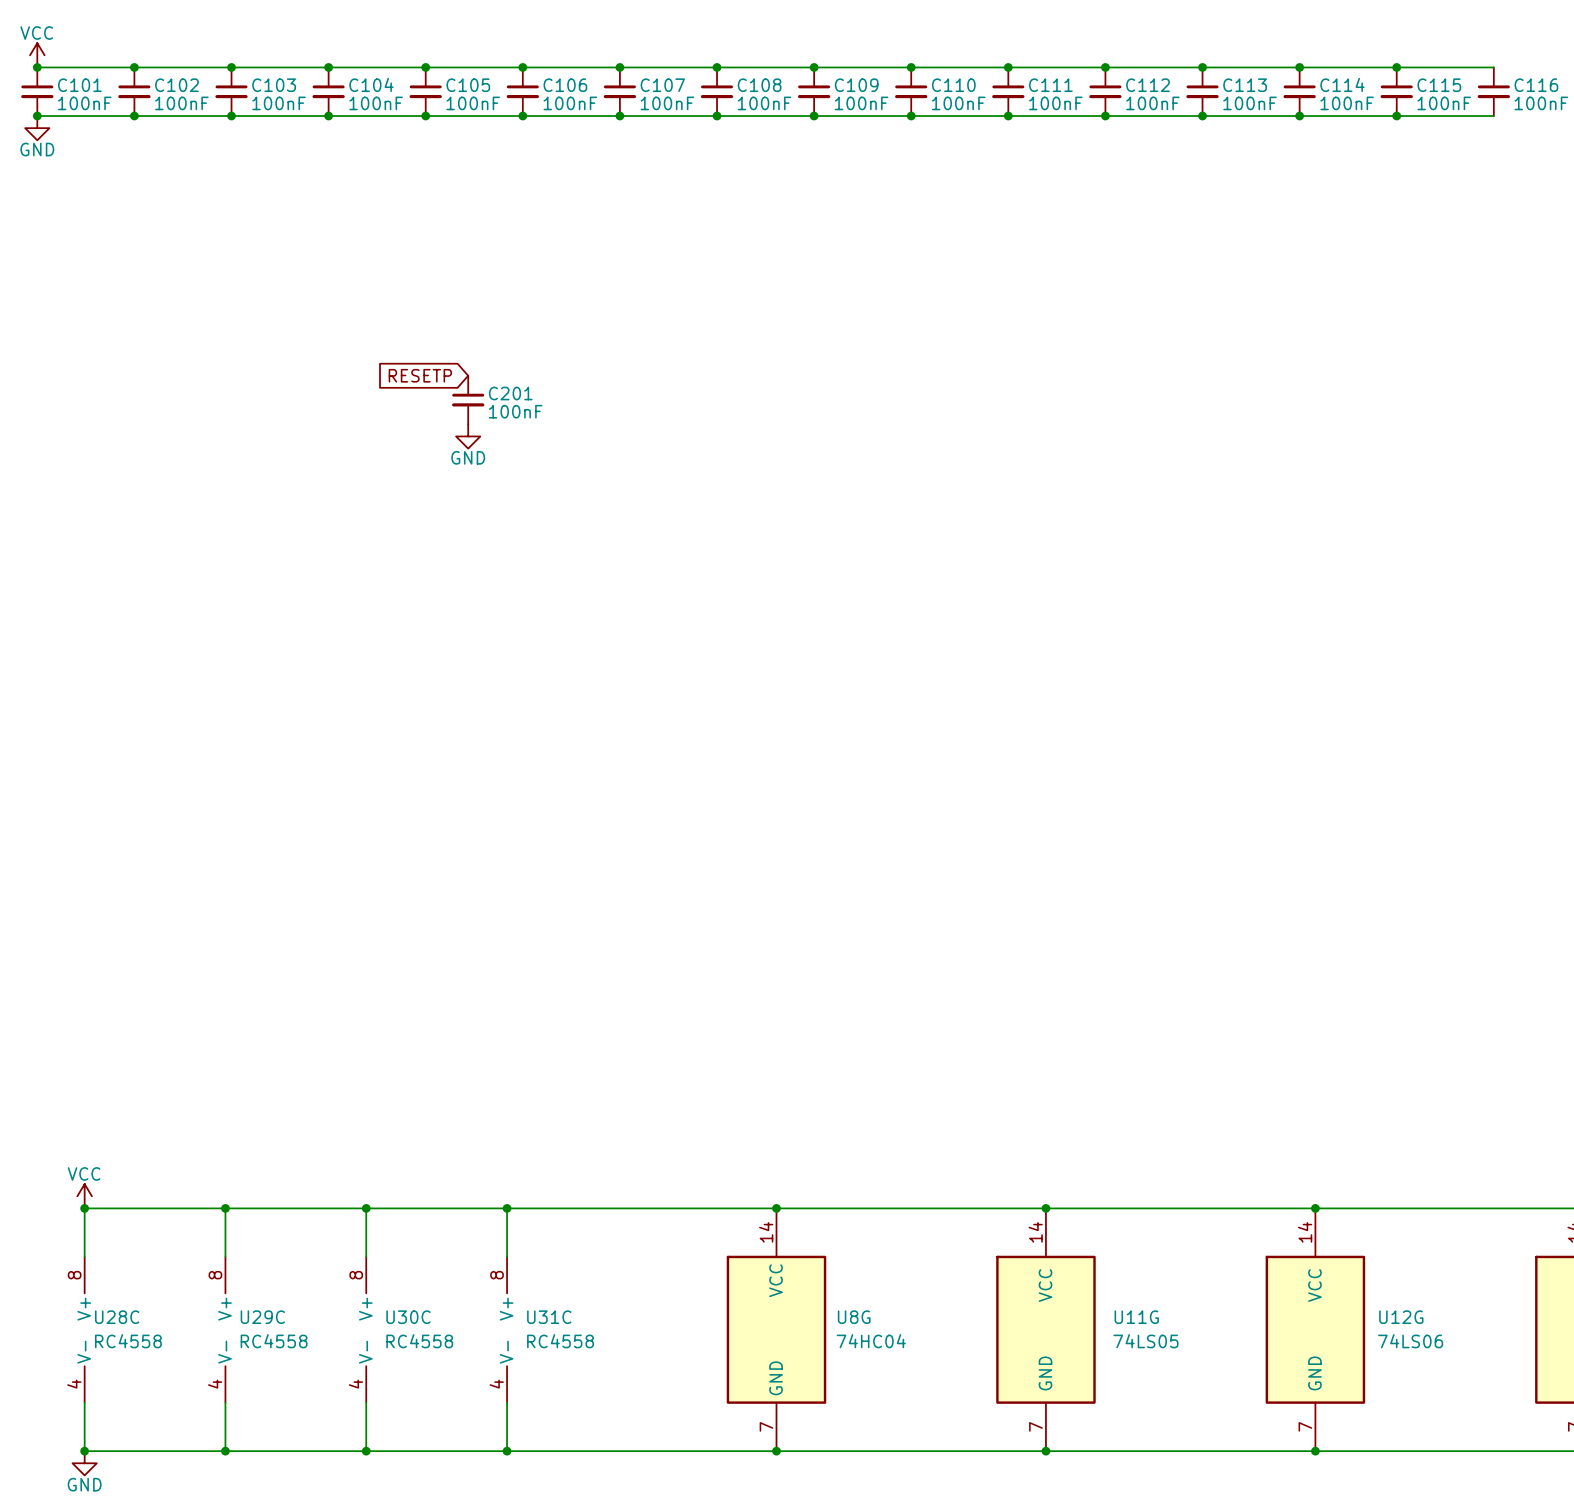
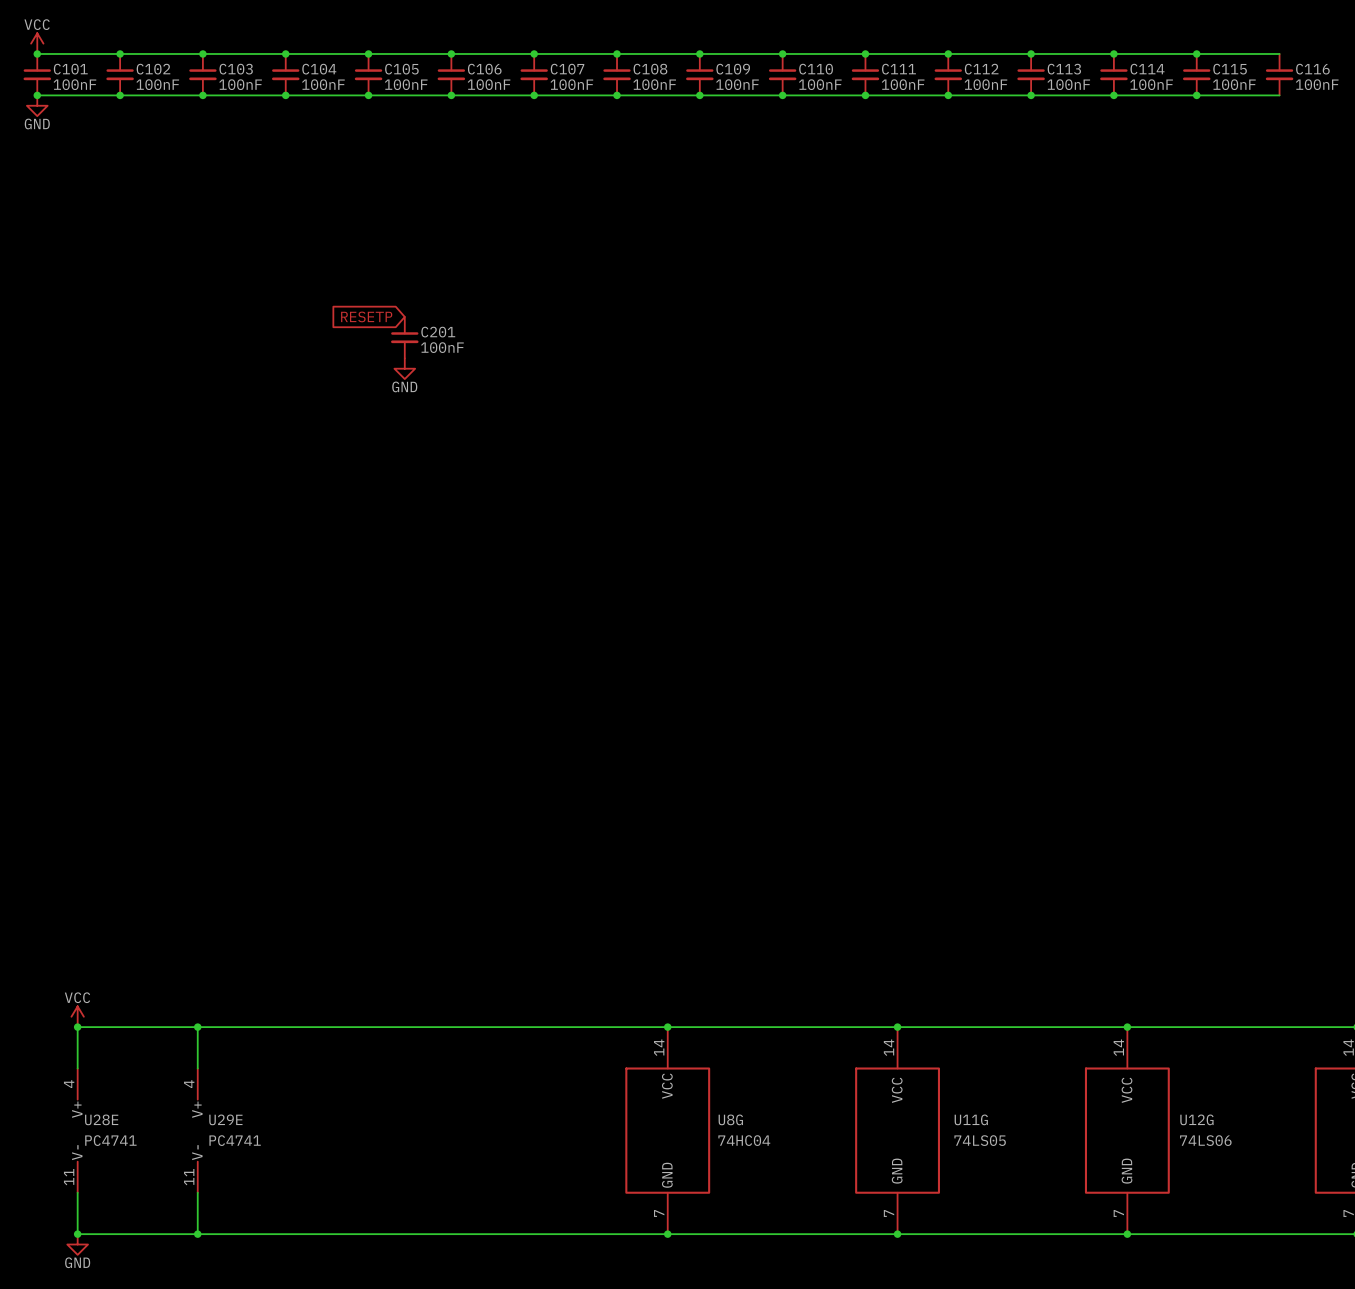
wire: (366, 1208) (366, 1256) -> none
junction: (366, 1208) -> none
wire: (507, 1208) (507, 1256) -> none
junction: (507, 1208) -> none
U28C pin number: 8 (74, 1275) -> 4 (69, 1084)
U29C pin number: 8 (215, 1275) -> 4 (189, 1084)
U28C name: U28C (117, 1317) -> U28E (101, 1119)
U29C name: U29C (262, 1317) -> U29E (225, 1119)
U30C: RC4558 (366, 1329) -> none
U31C: RC4558 (507, 1329) -> none
U28C value: RC4558 (128, 1341) -> PC4741 (110, 1140)
U29C value: RC4558 (274, 1341) -> PC4741 (235, 1140)
U28C pin number: 4 (74, 1384) -> 11 (69, 1177)
U29C pin number: 4 (215, 1384) -> 11 (189, 1177)
wire: (366, 1402) (366, 1451) -> none
wire: (507, 1402) (507, 1451) -> none
junction: (366, 1451) -> none
junction: (507, 1451) -> none

